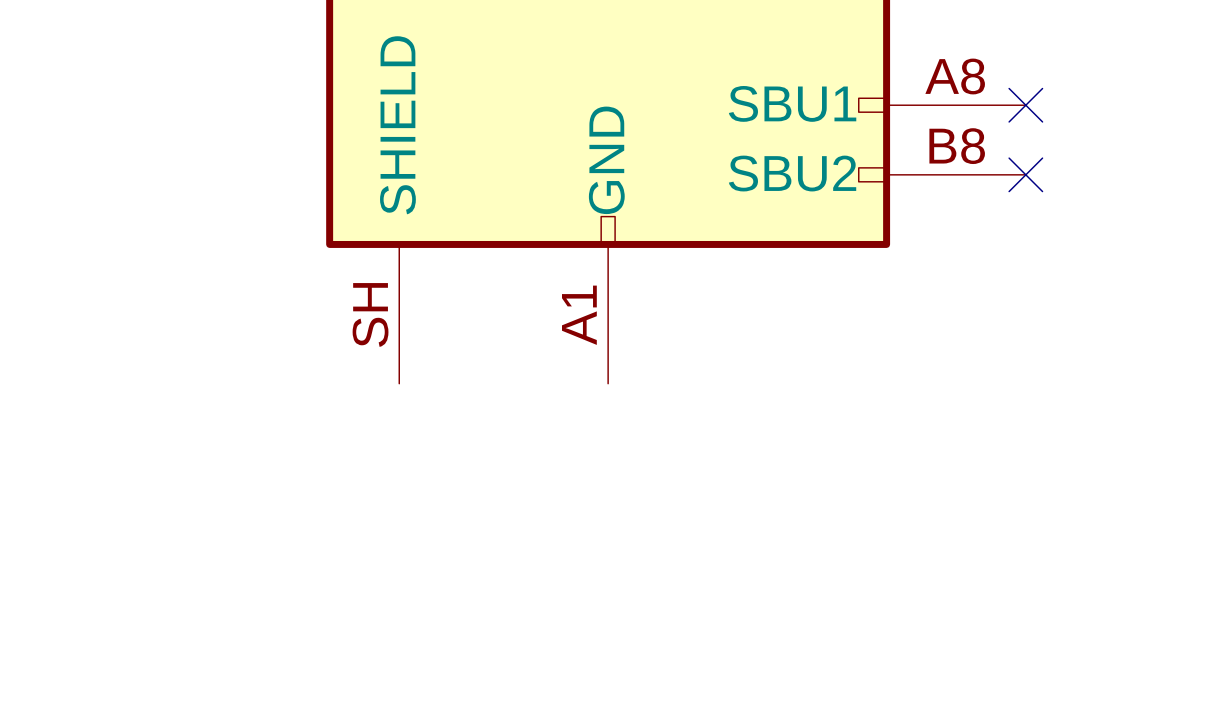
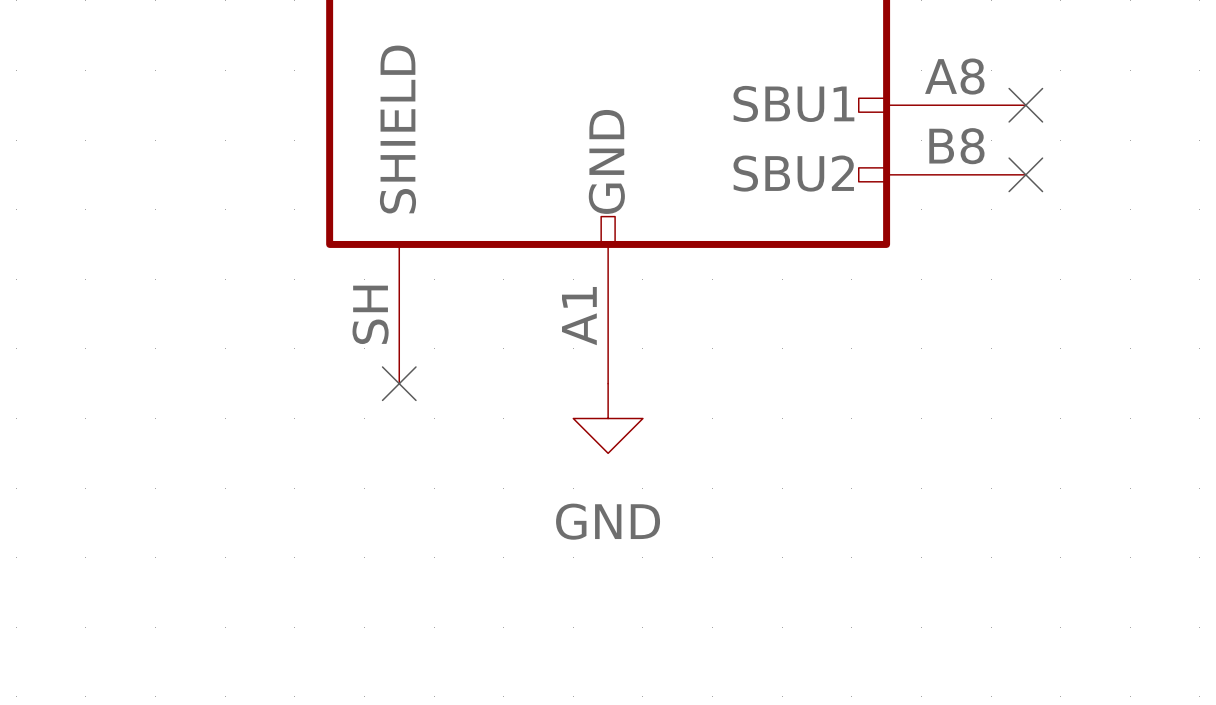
no-connect mark: none -> (399, 383)
power symbol: none -> GND (608, 418)

